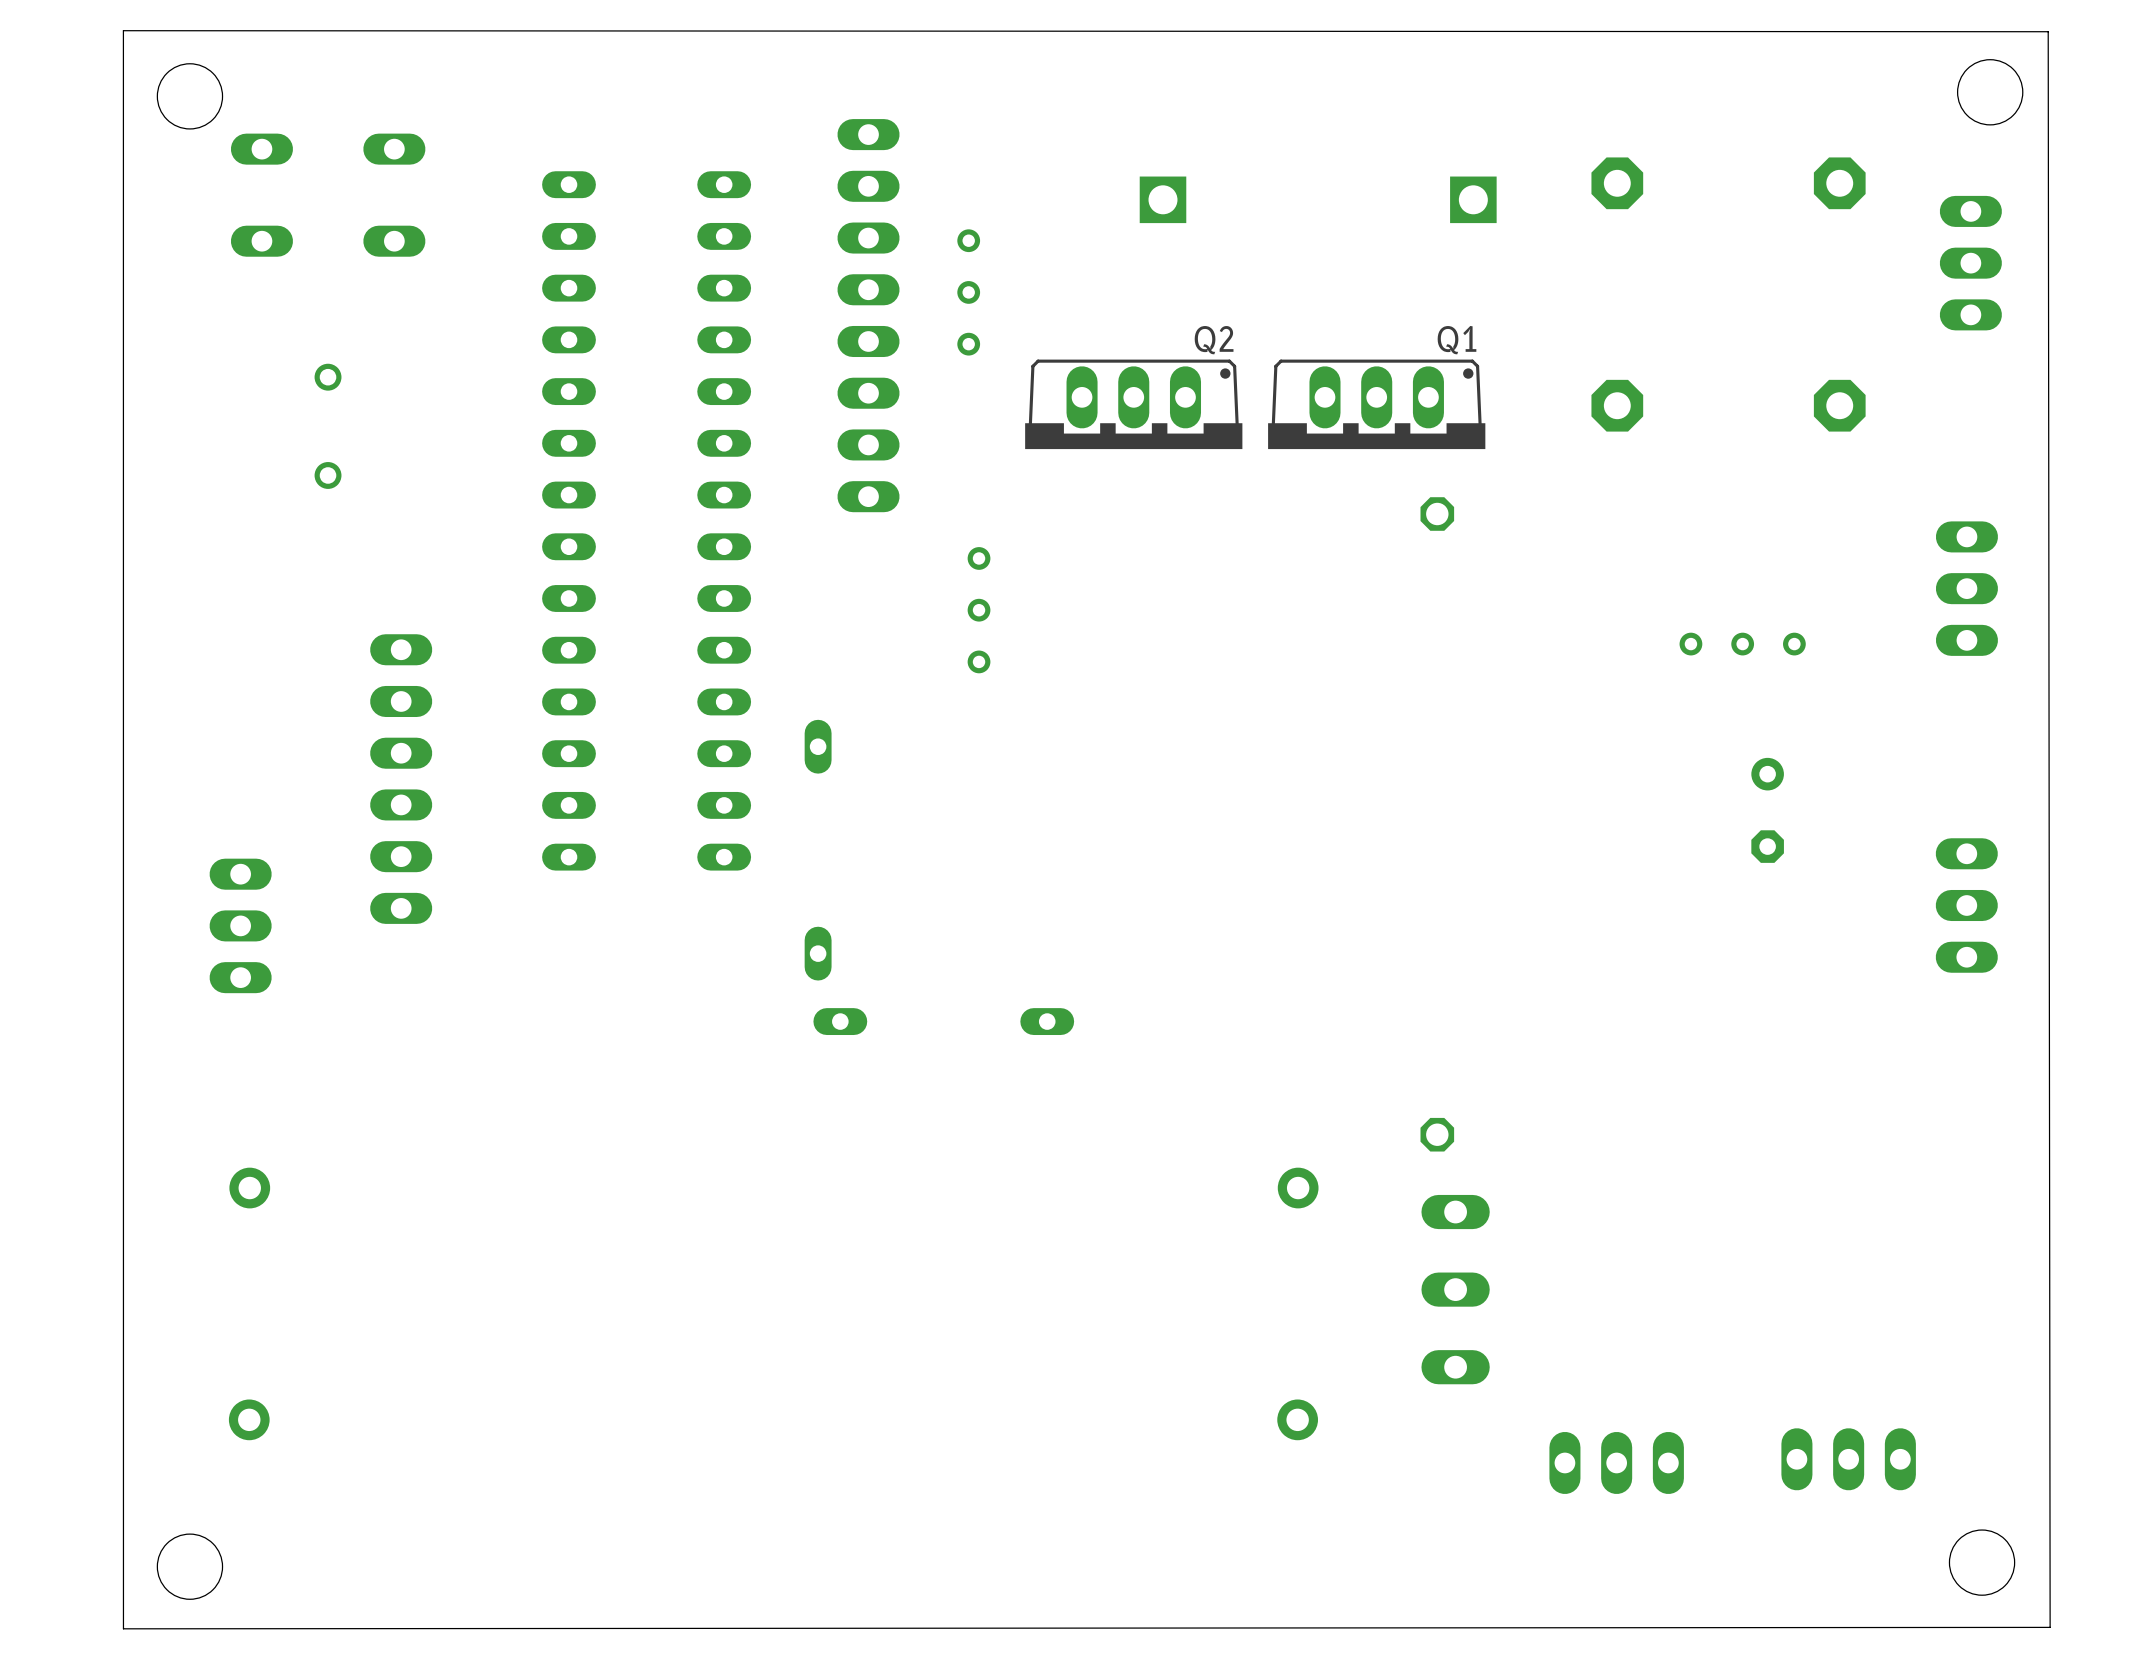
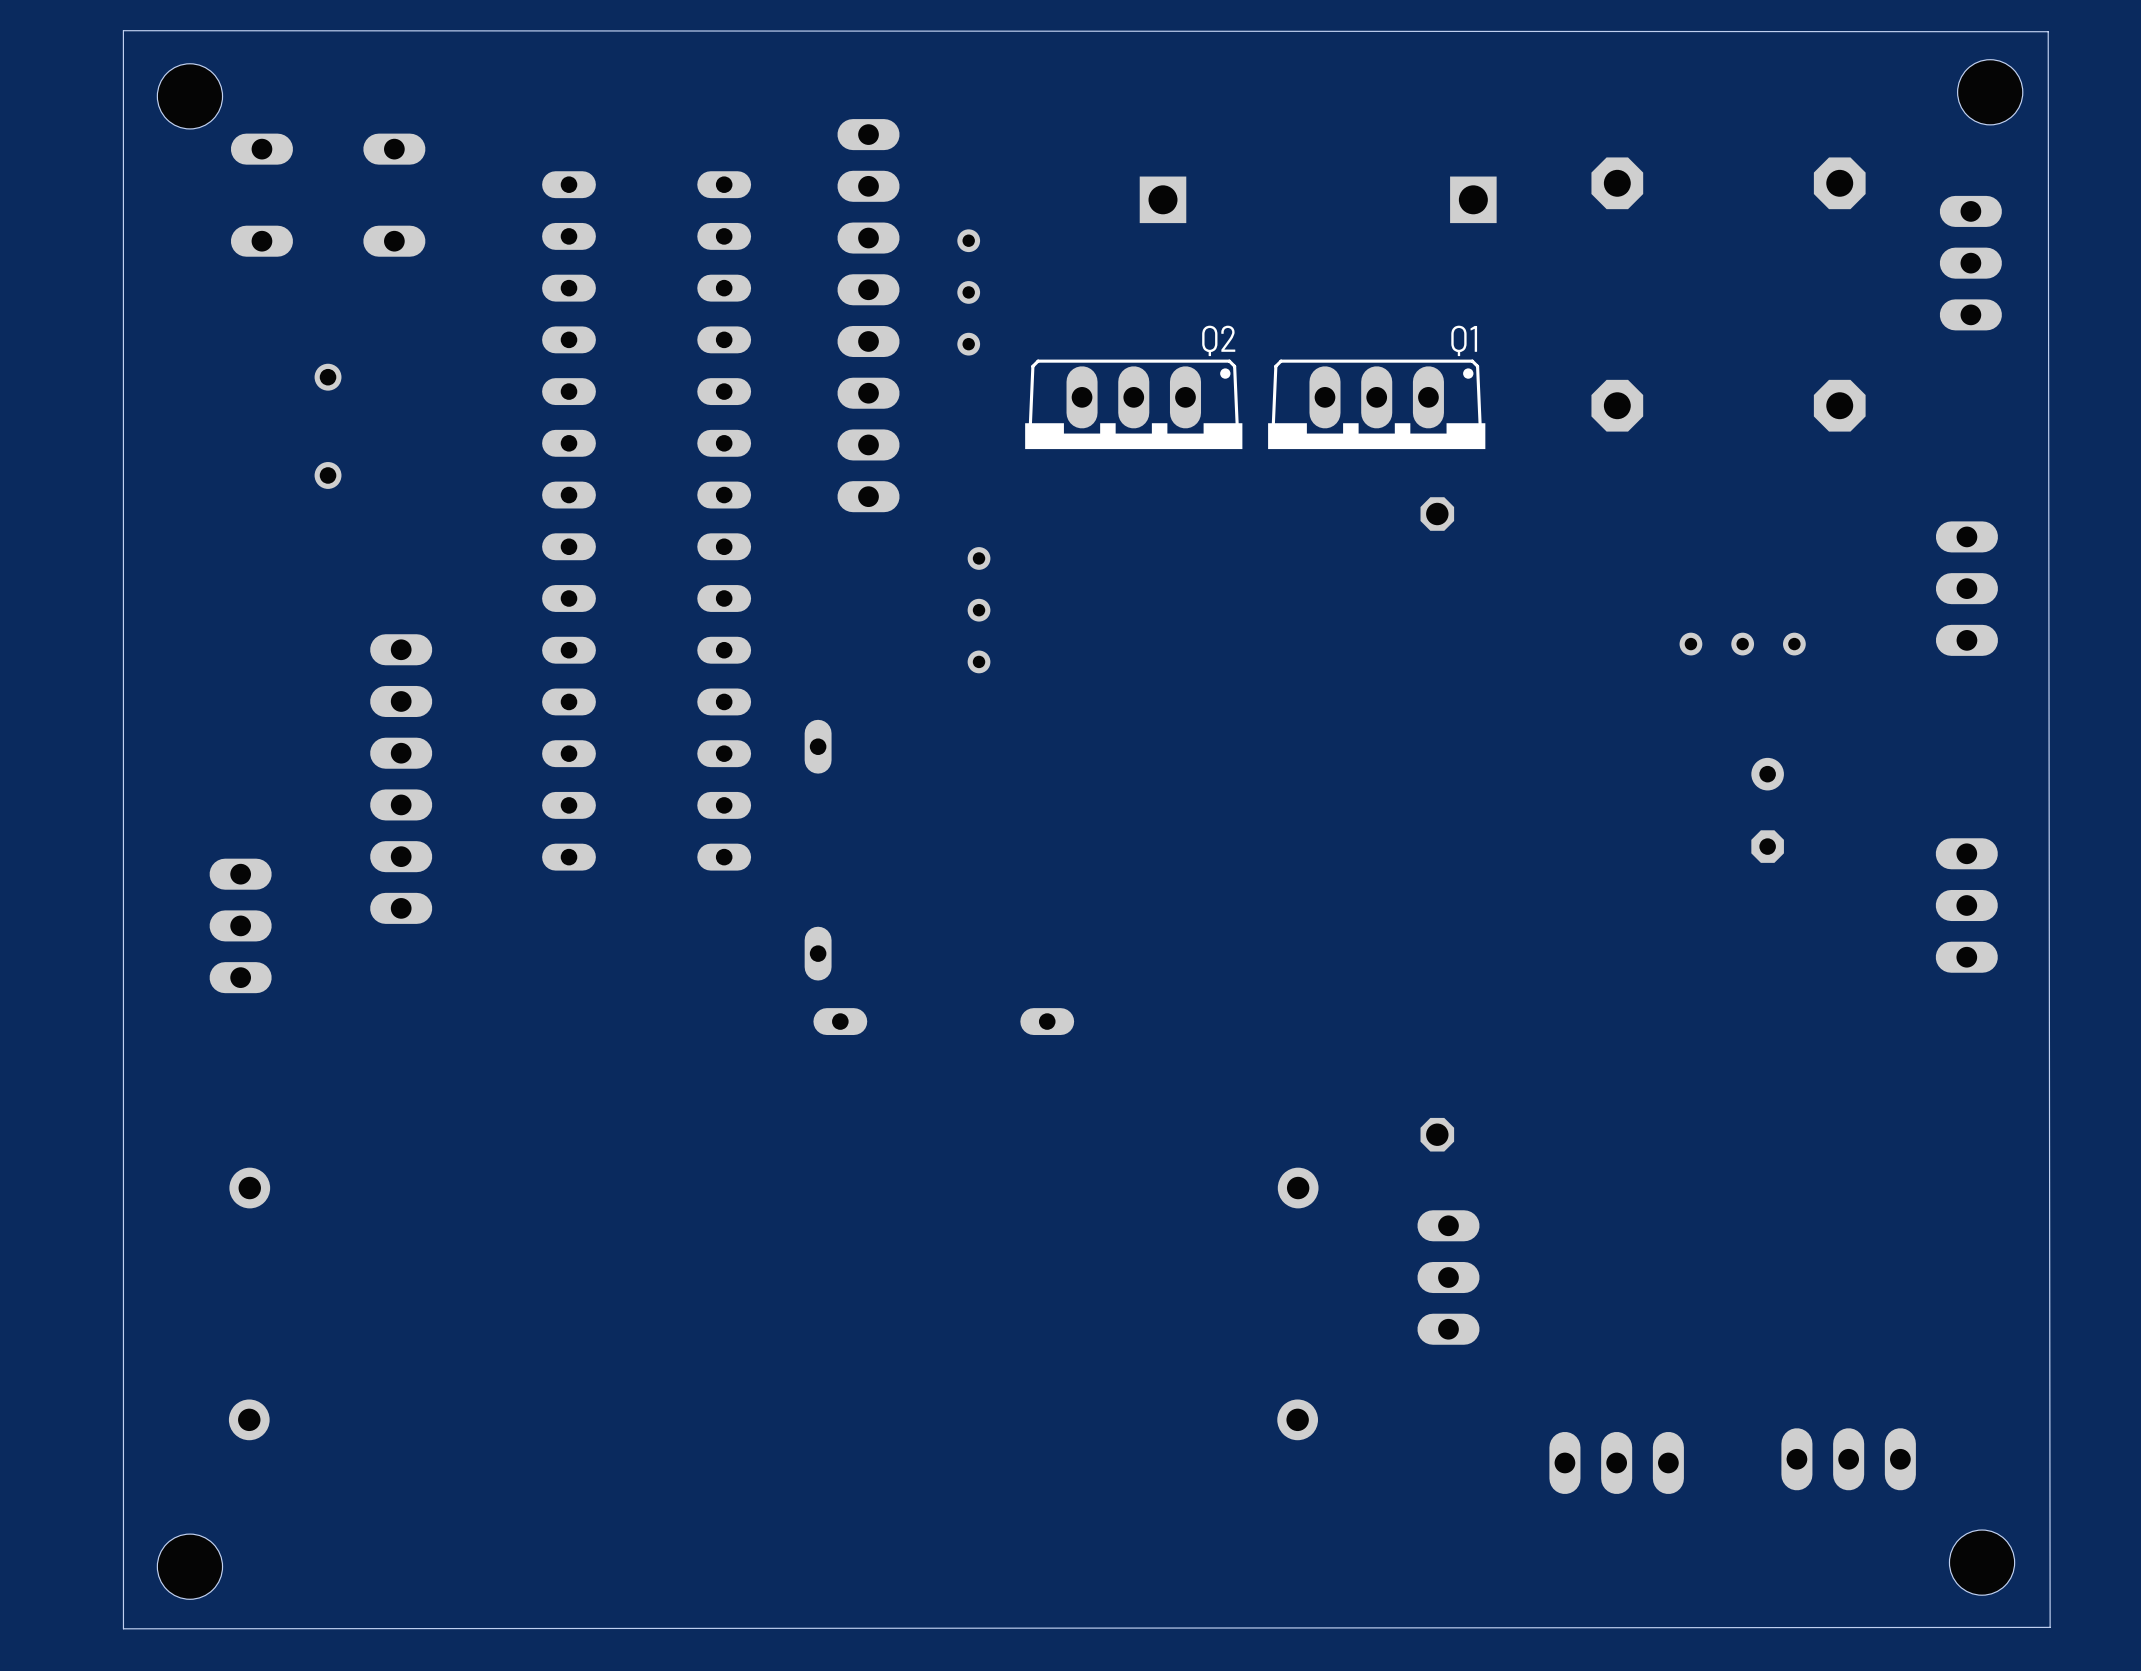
part footprint: [1421, 1194, 1490, 1385] -> [1417, 1210, 1480, 1345]

